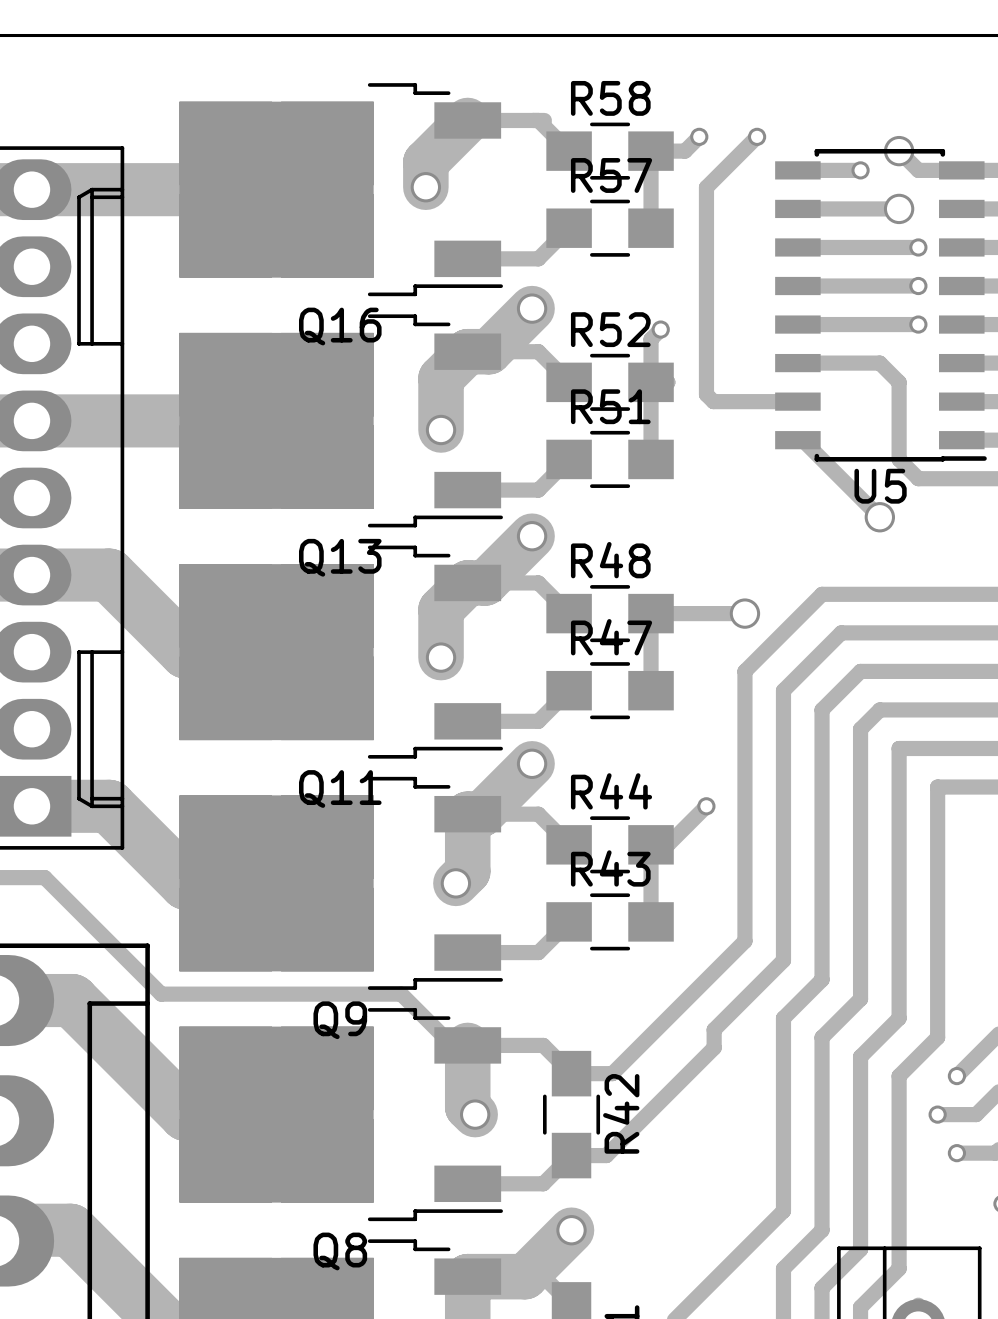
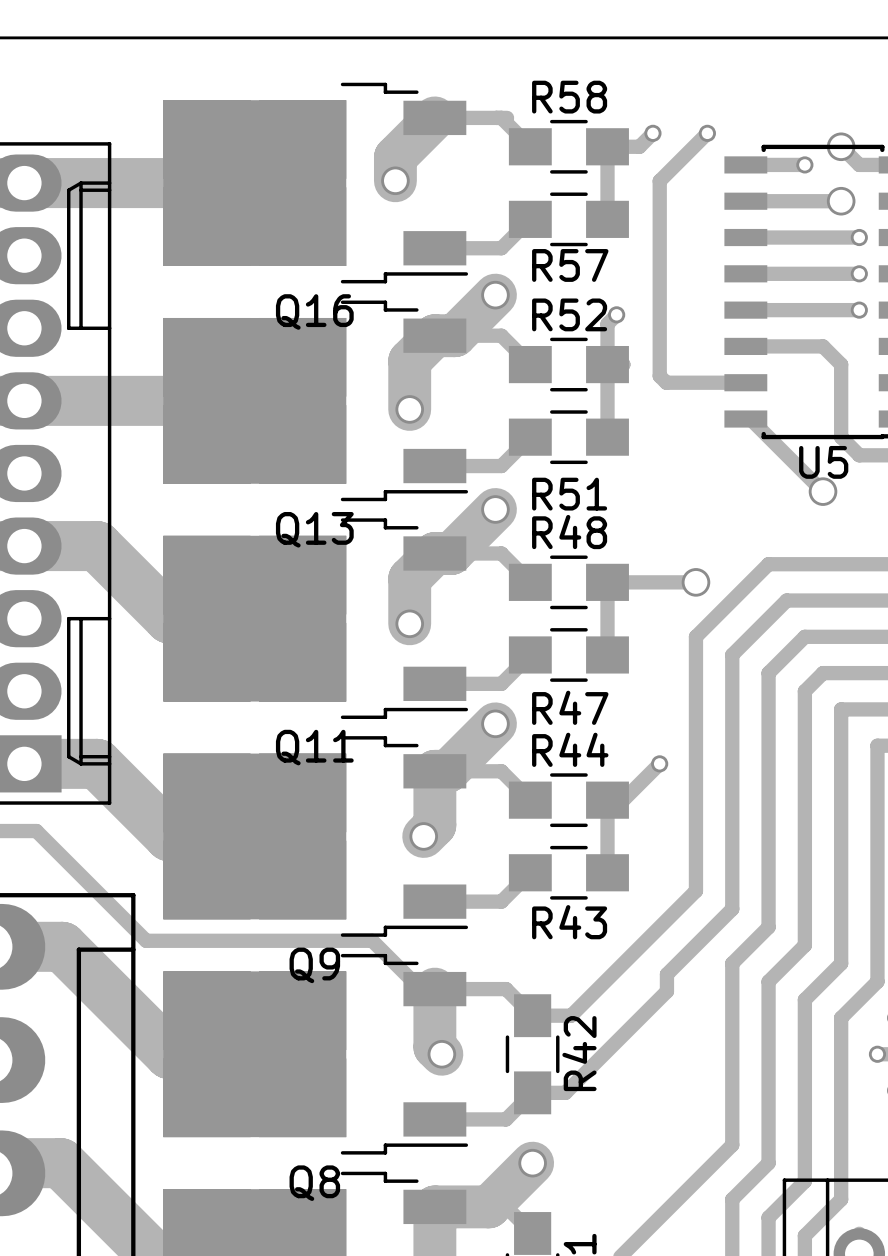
R57 name position: R57 (611, 175) -> R57 (570, 265)
R51 name position: R51 (610, 406) -> R51 (569, 494)
R47 name position: R47 (611, 637) -> R47 (570, 707)
R43 name position: R43 (610, 868) -> R43 (569, 922)

